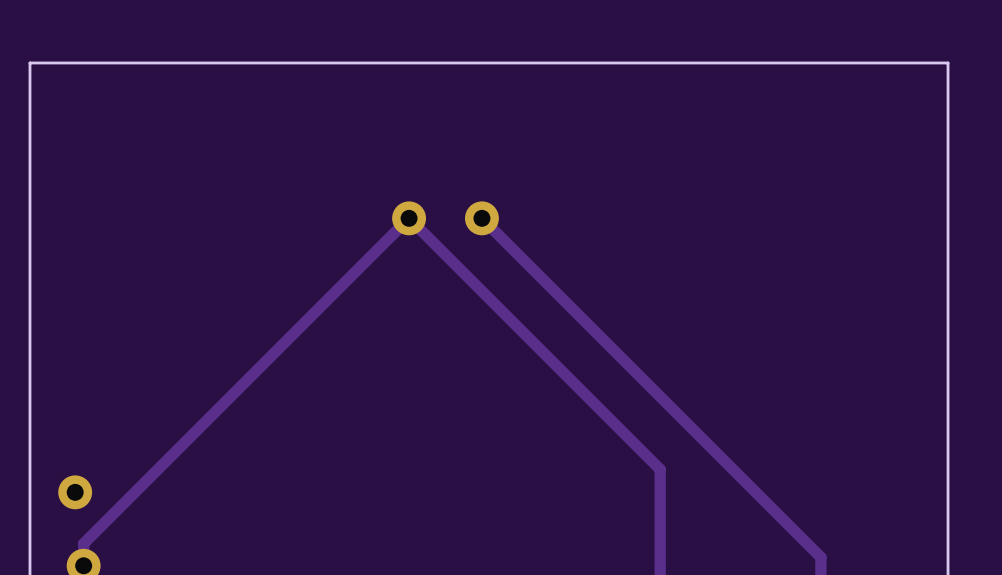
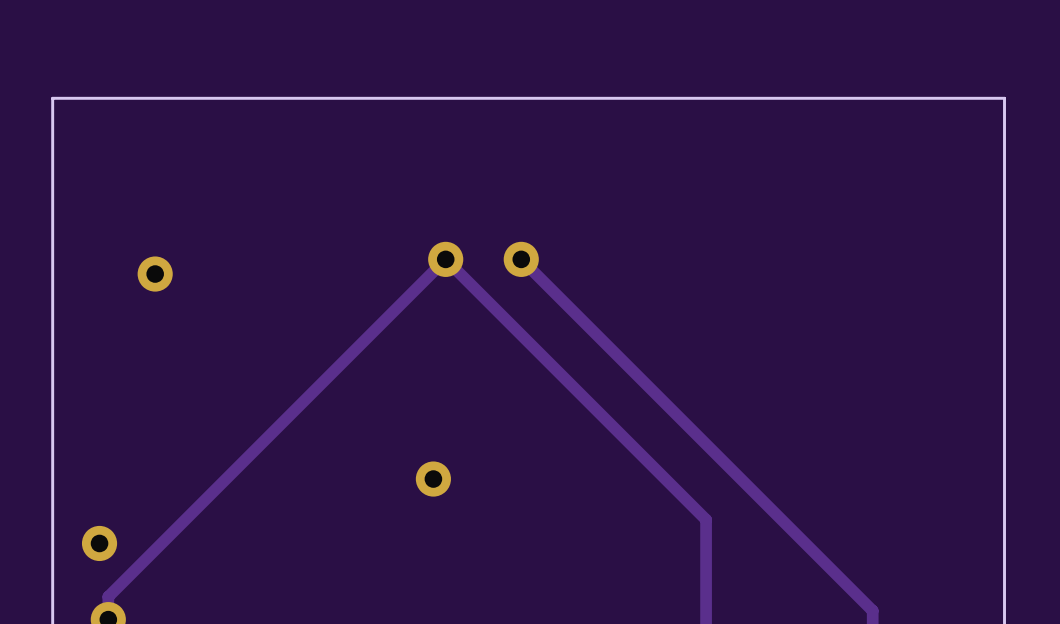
via: none -> (155, 274)
via: none -> (433, 479)

